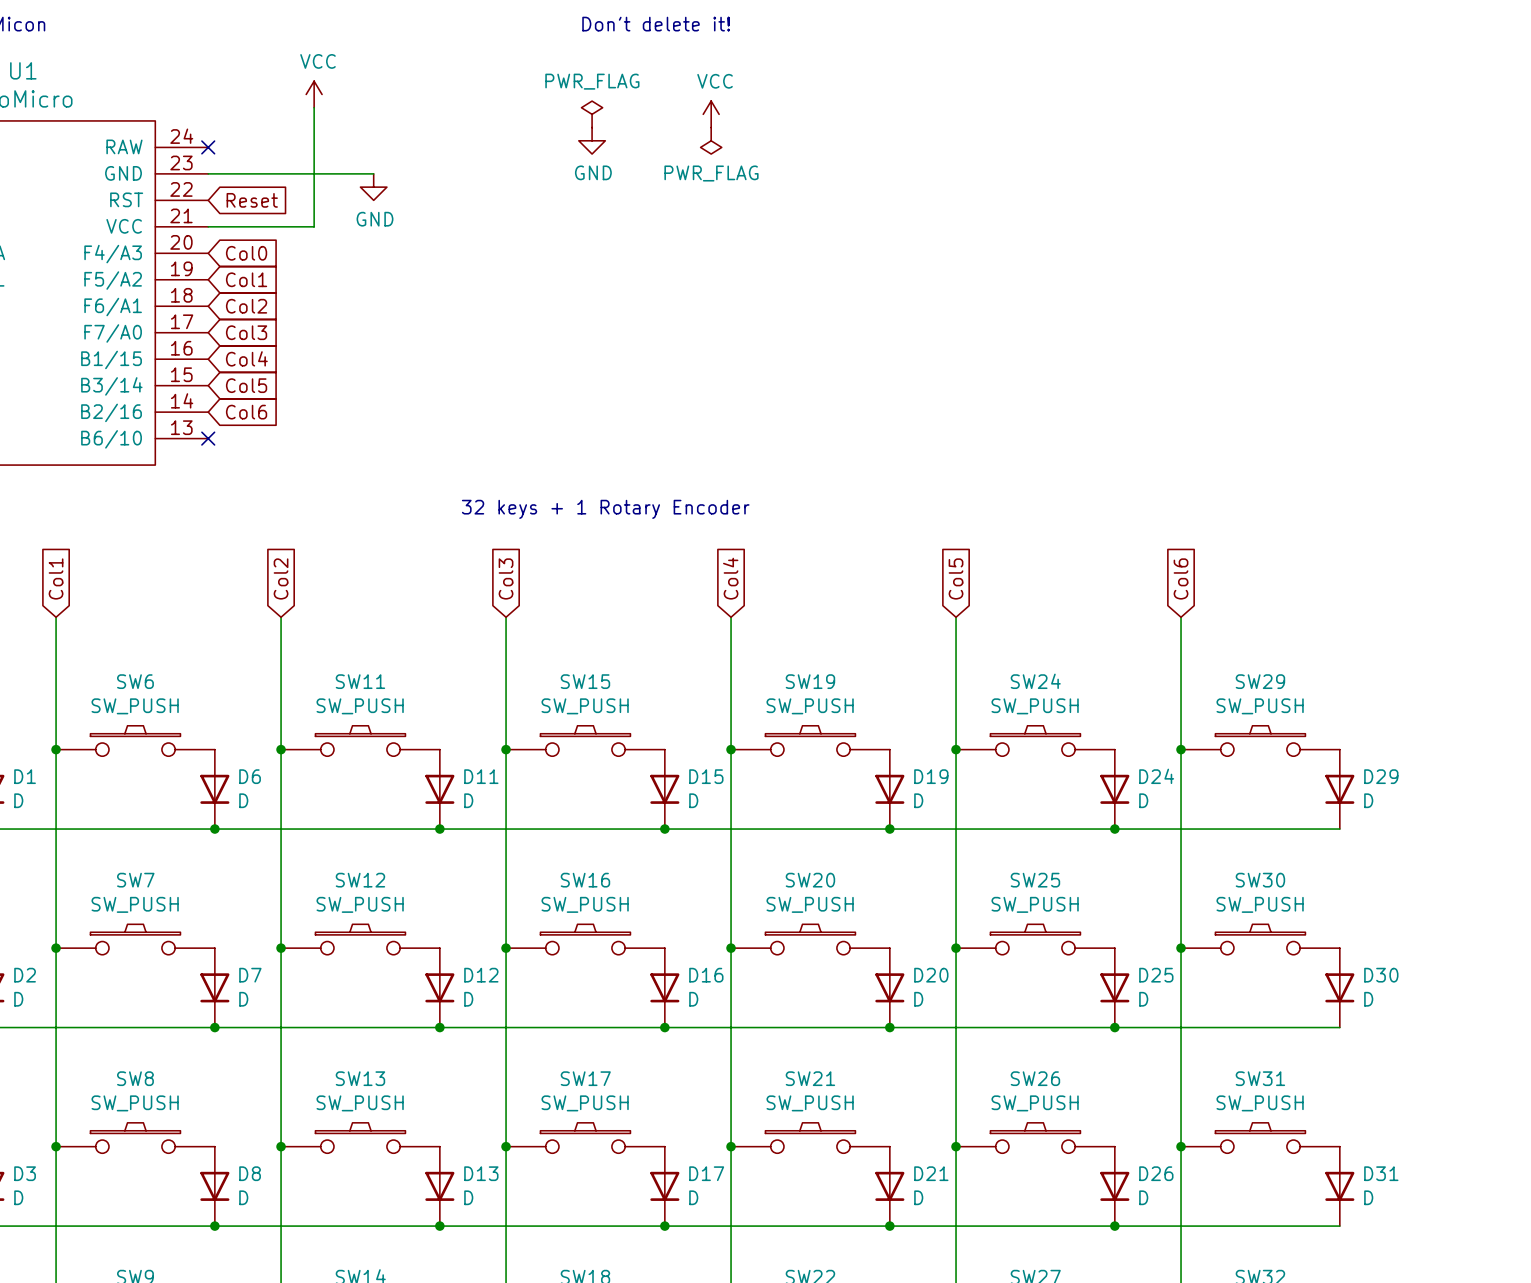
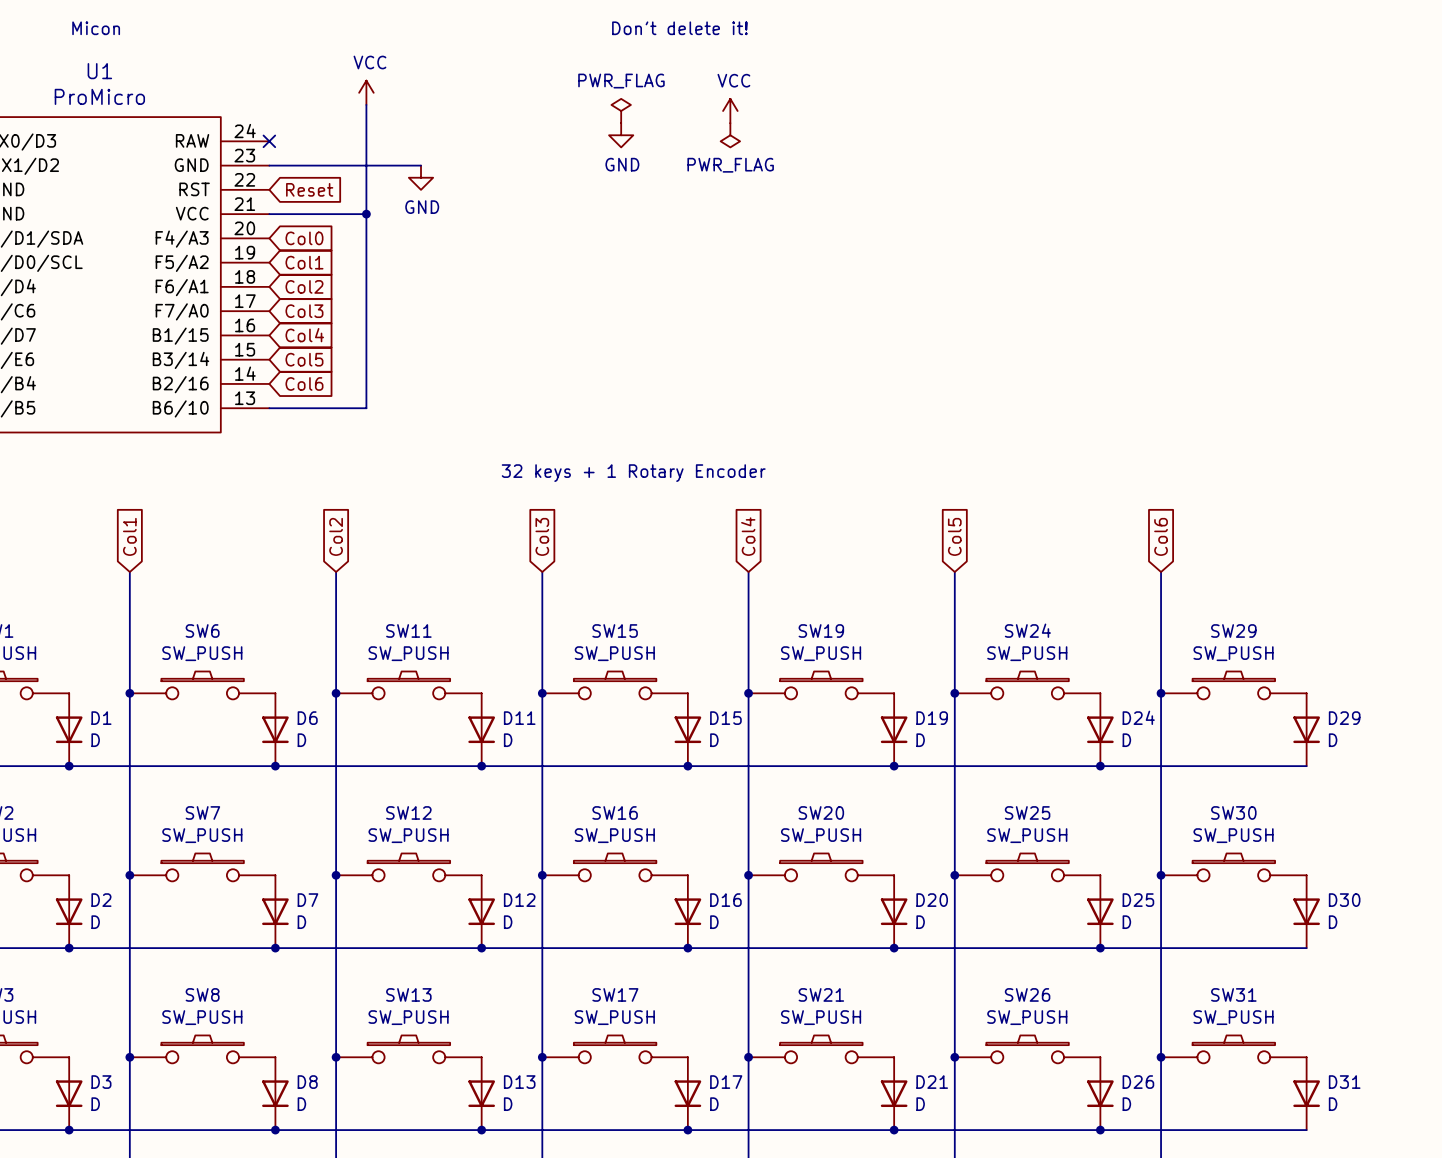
wire: none -> (366, 214) (366, 408) (269, 408)
junction: none -> (366, 214)
no-connect mark: (208, 438) -> none

